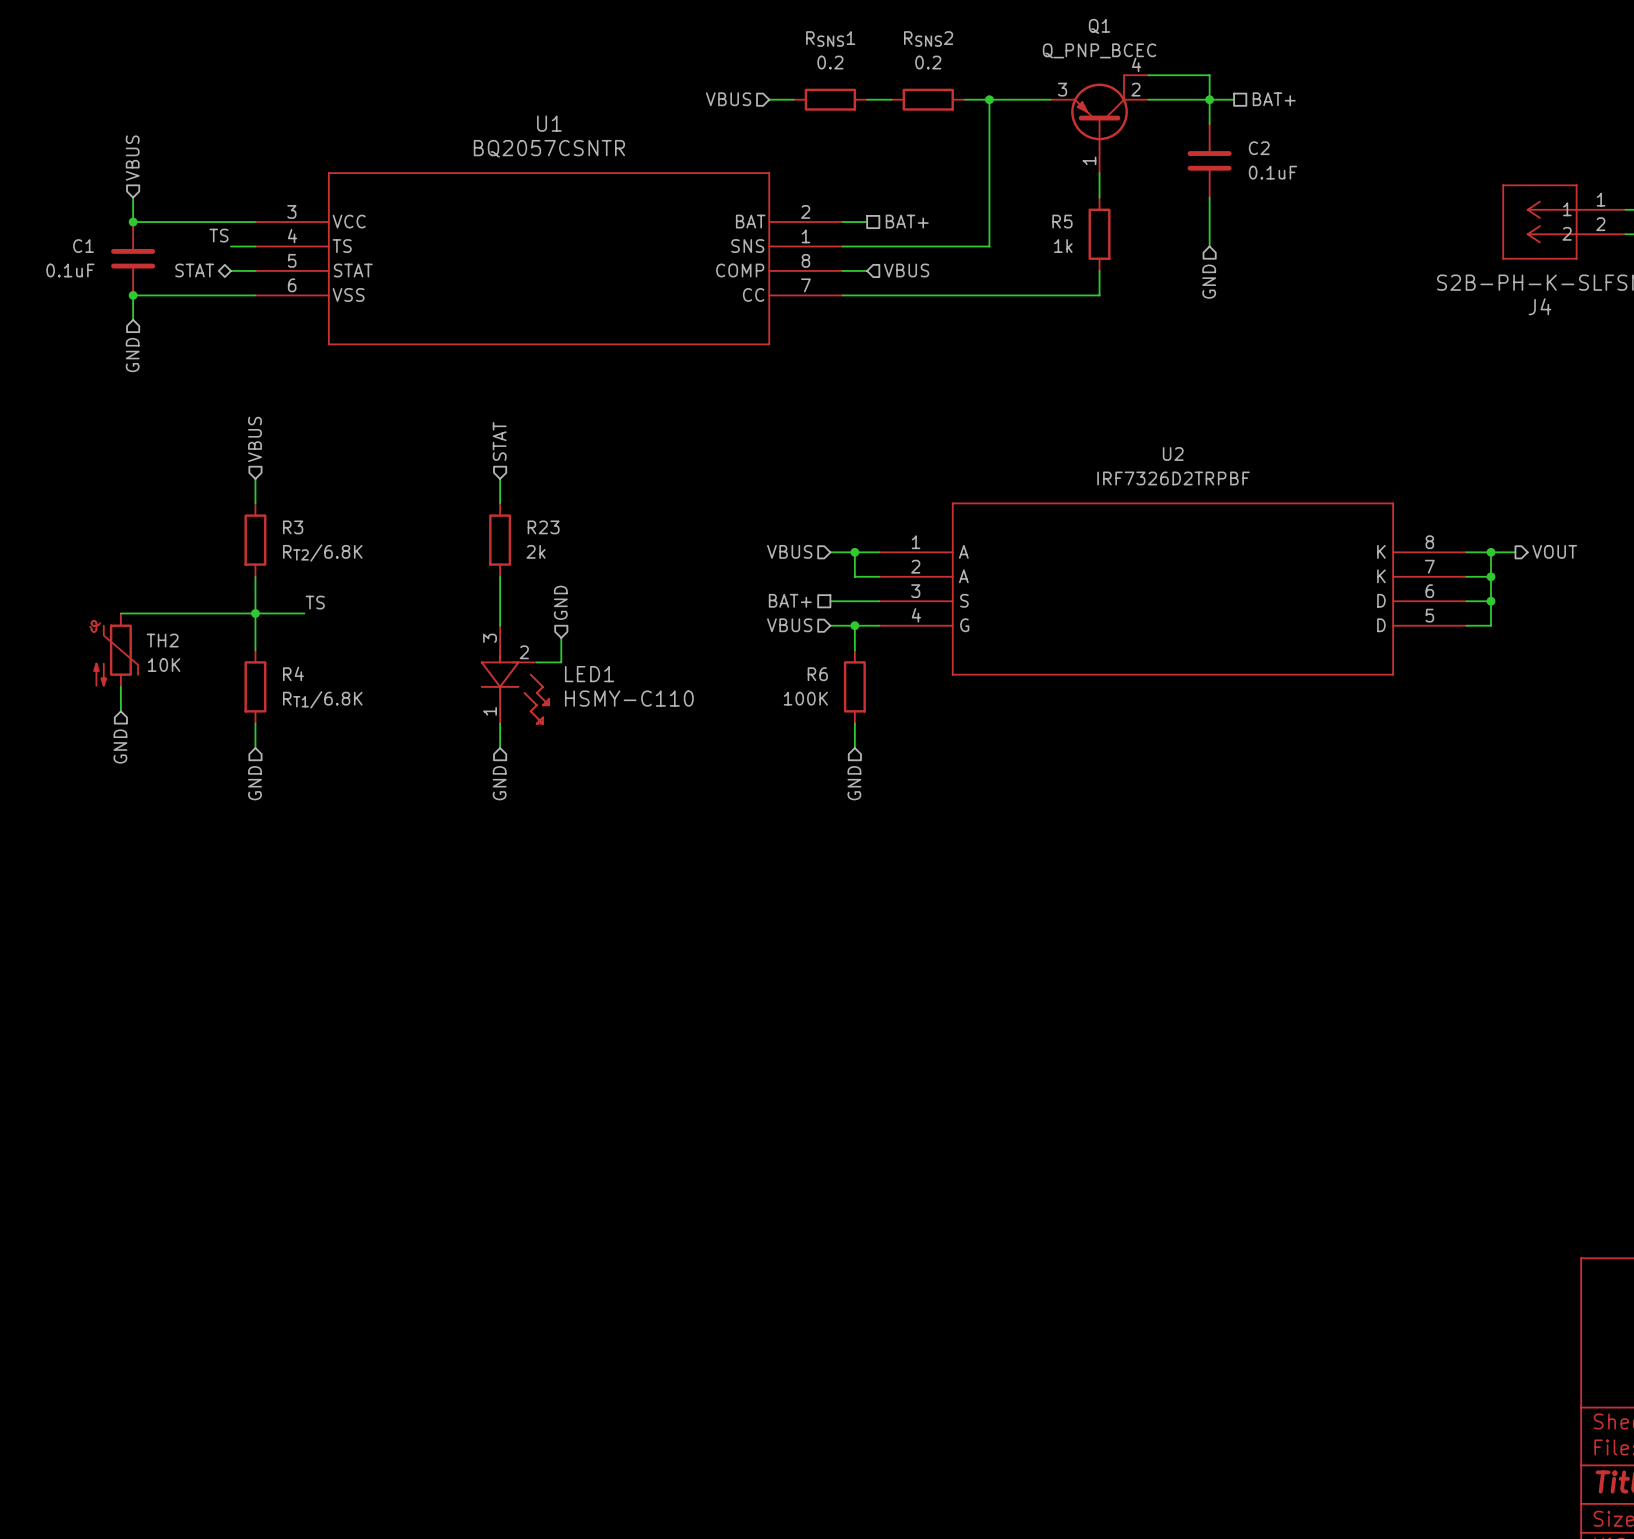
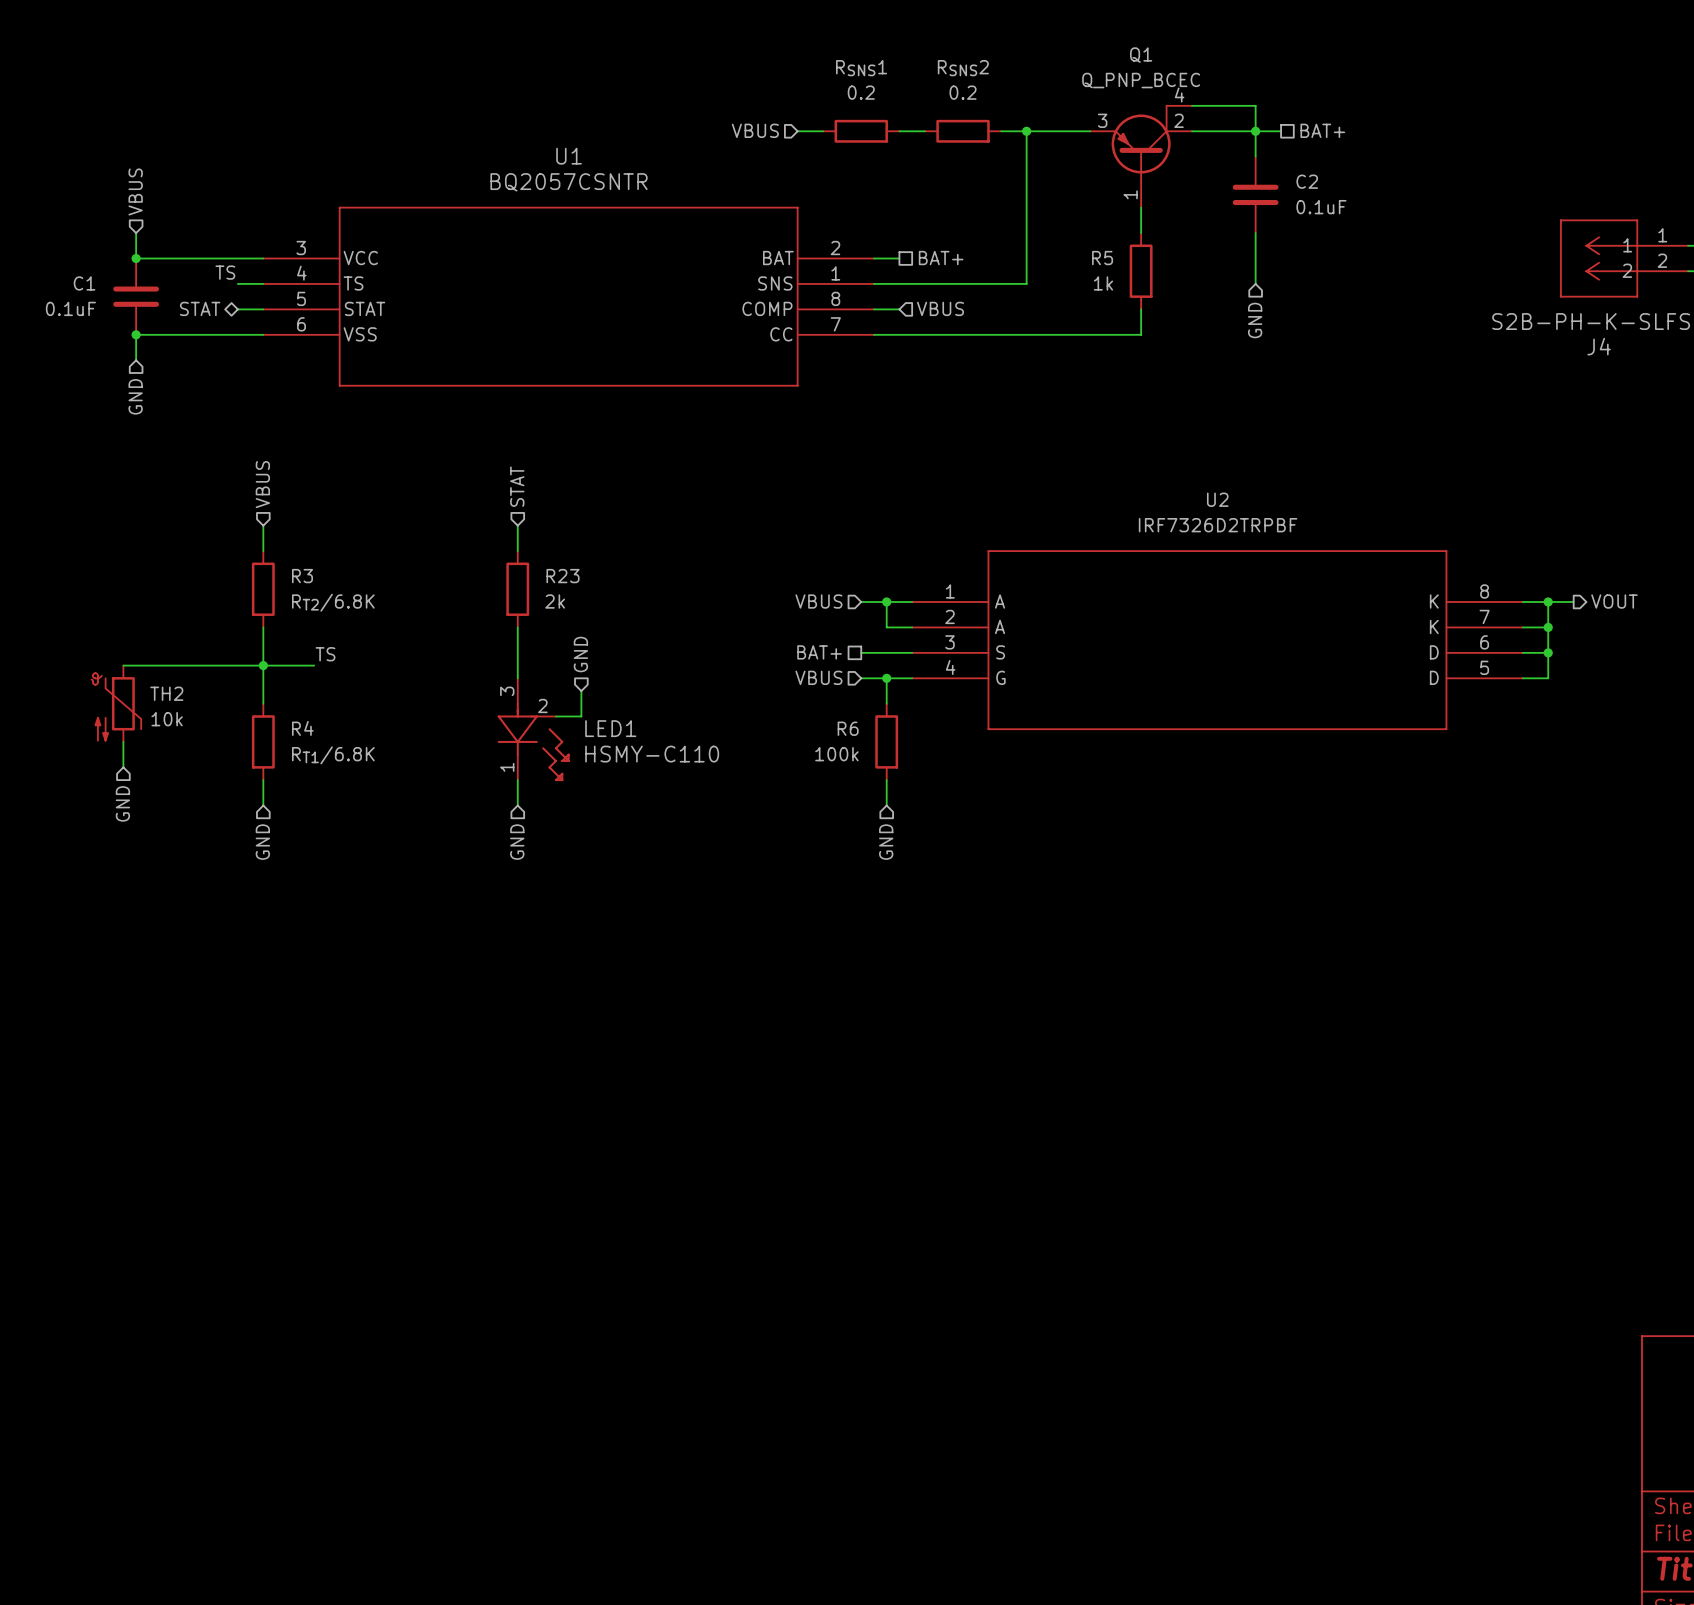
TH2 value: 10K (164, 665) -> 10k (167, 719)
R6 value: 100K (805, 698) -> 100k (836, 754)

